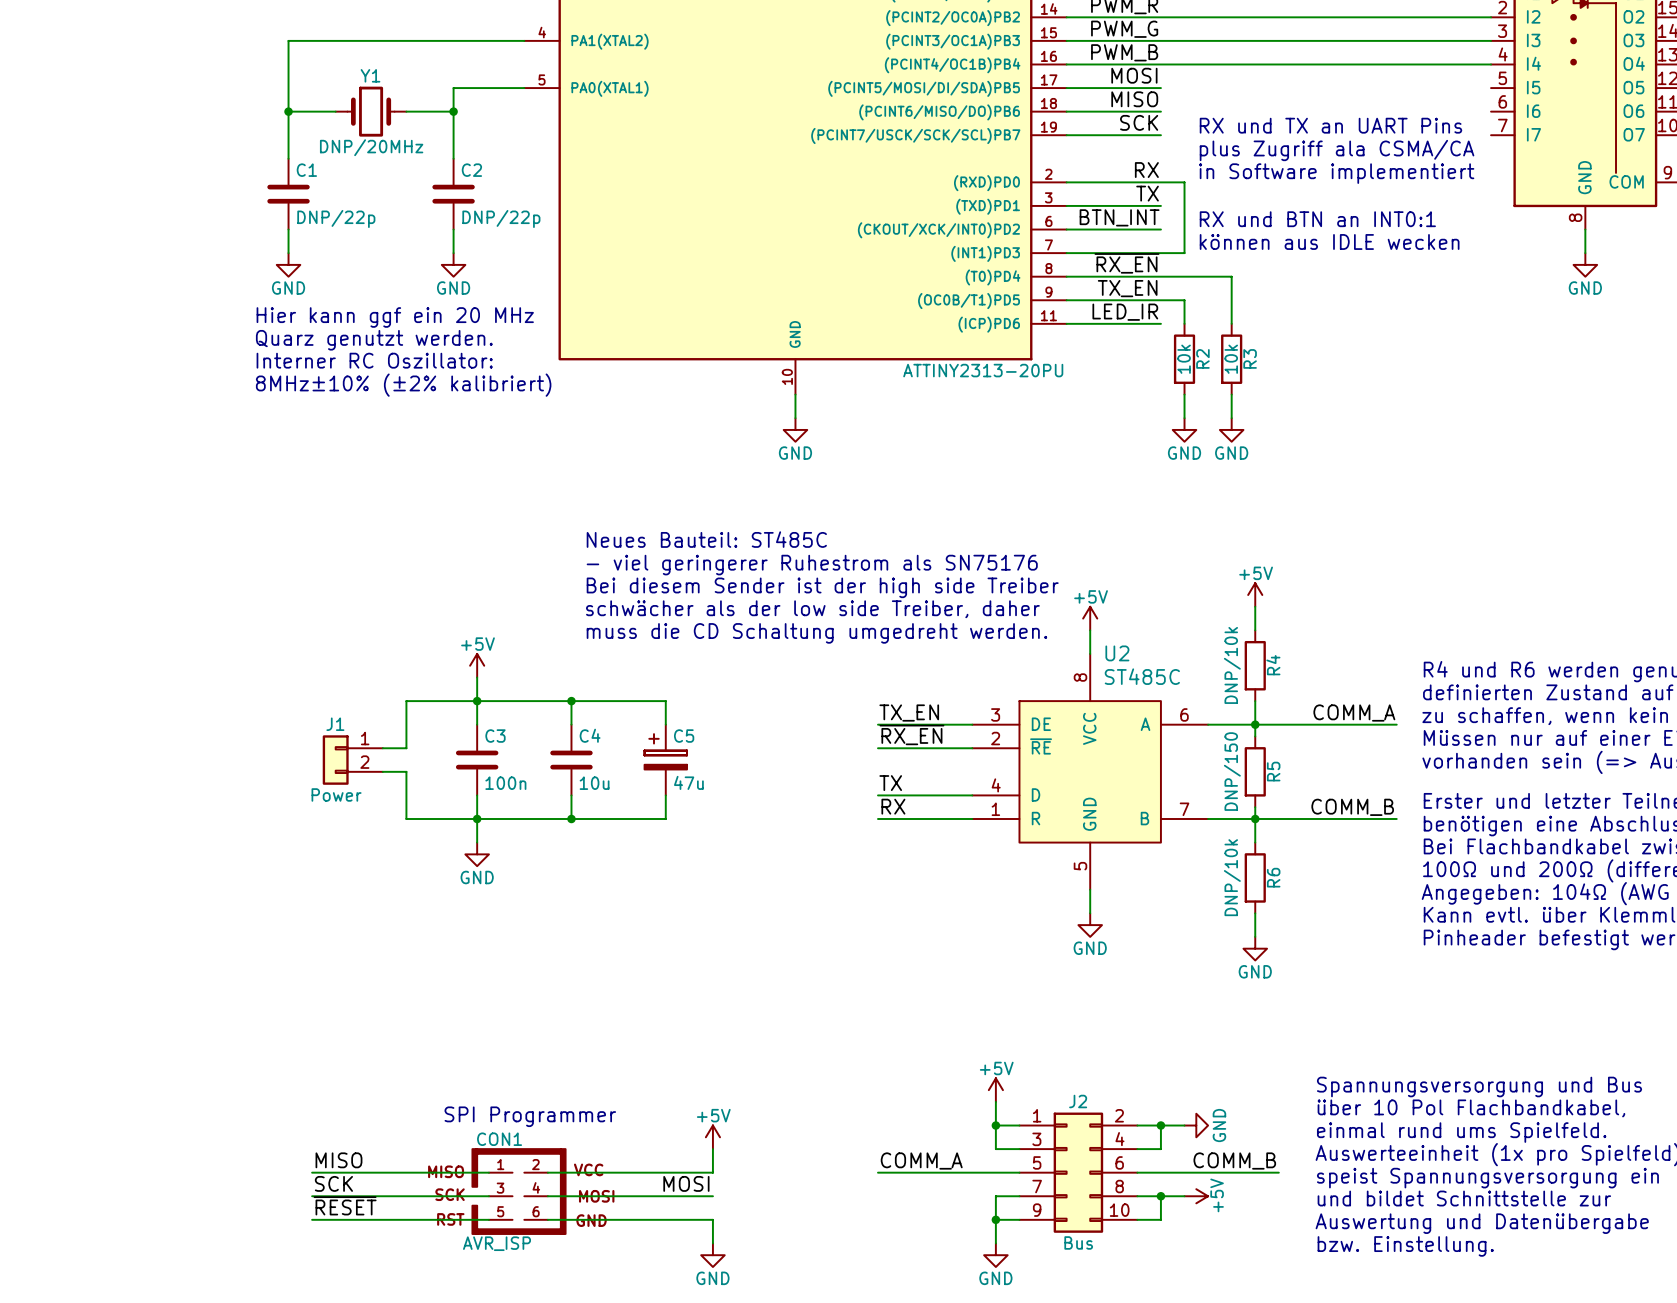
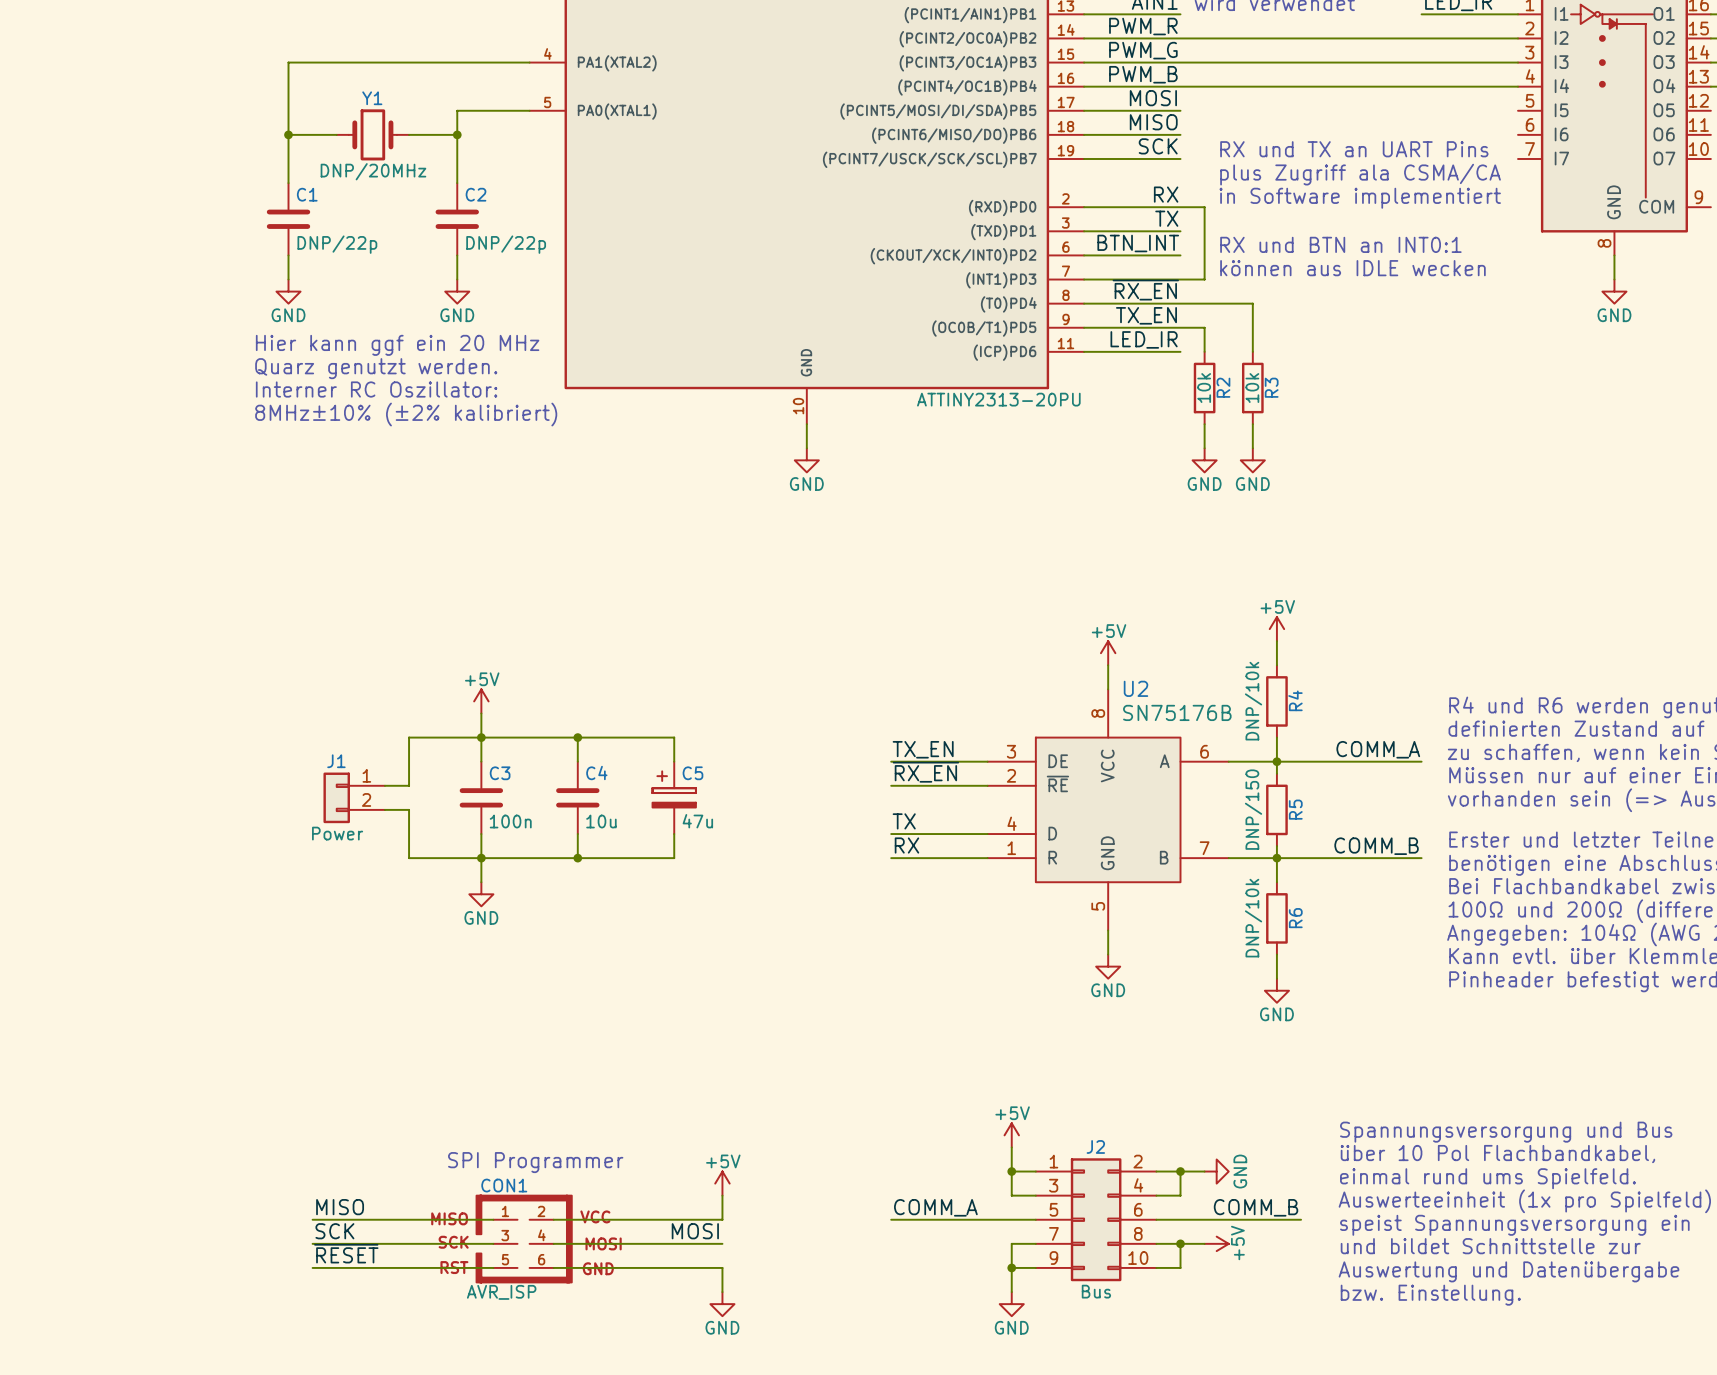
text: Neues Bauteil: ST485C (706, 539) -> none
text: - viel geringerer Ruhestrom als SN75176 (812, 565) -> none
text: Bei diesem Sender ist der high side Treiber (822, 587) -> none
text: schwächer als der low side Treiber, daher (812, 609) -> none
text: muss die CD Schaltung umgedreht werden. (816, 633) -> none
U2 value: ST485C (1142, 676) -> SN75176B (1177, 712)

